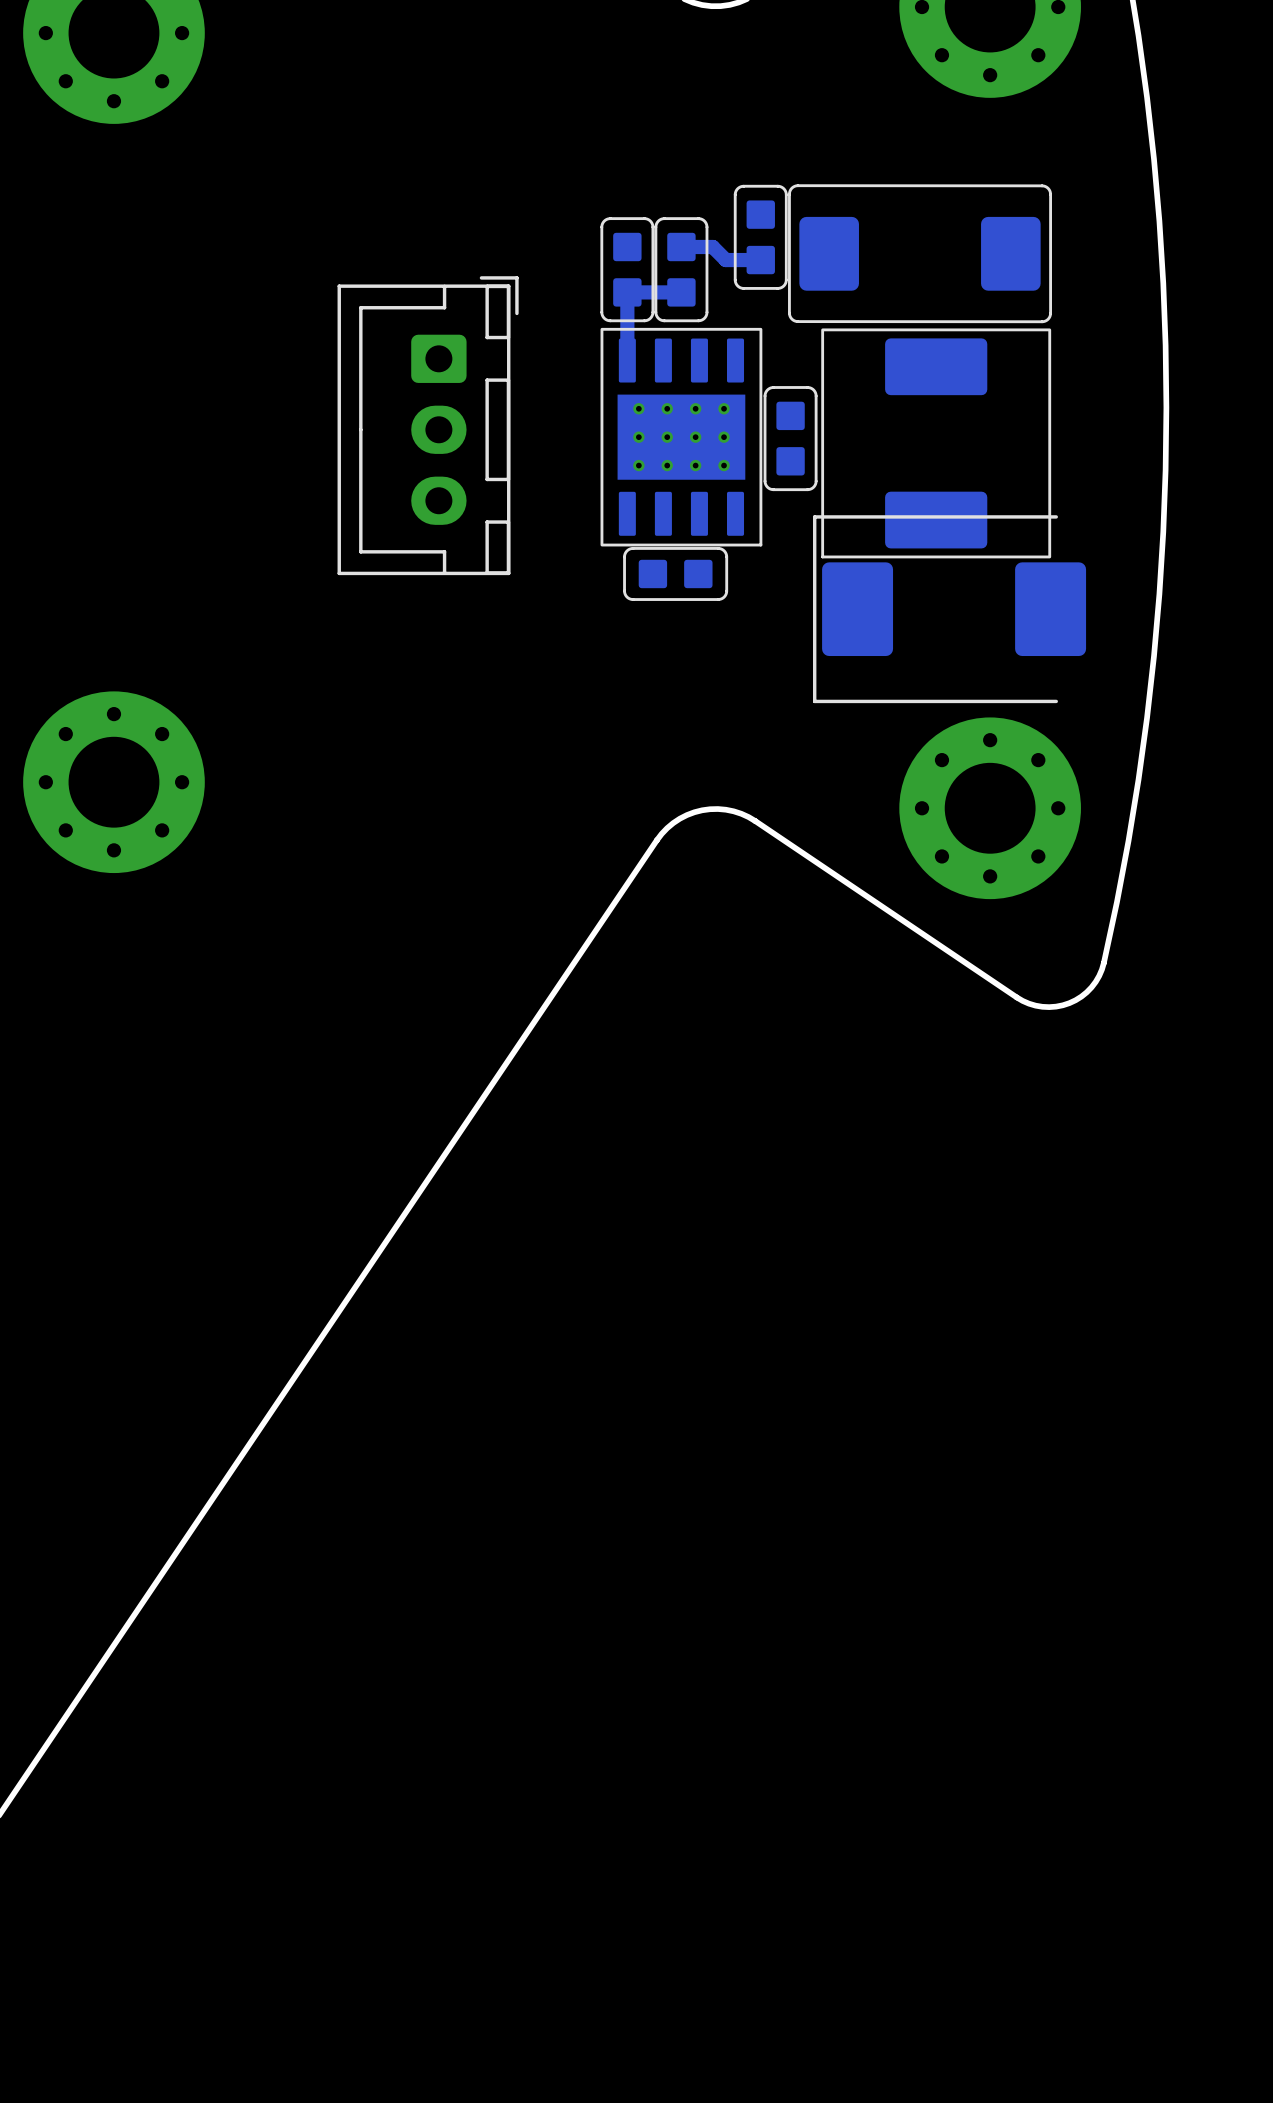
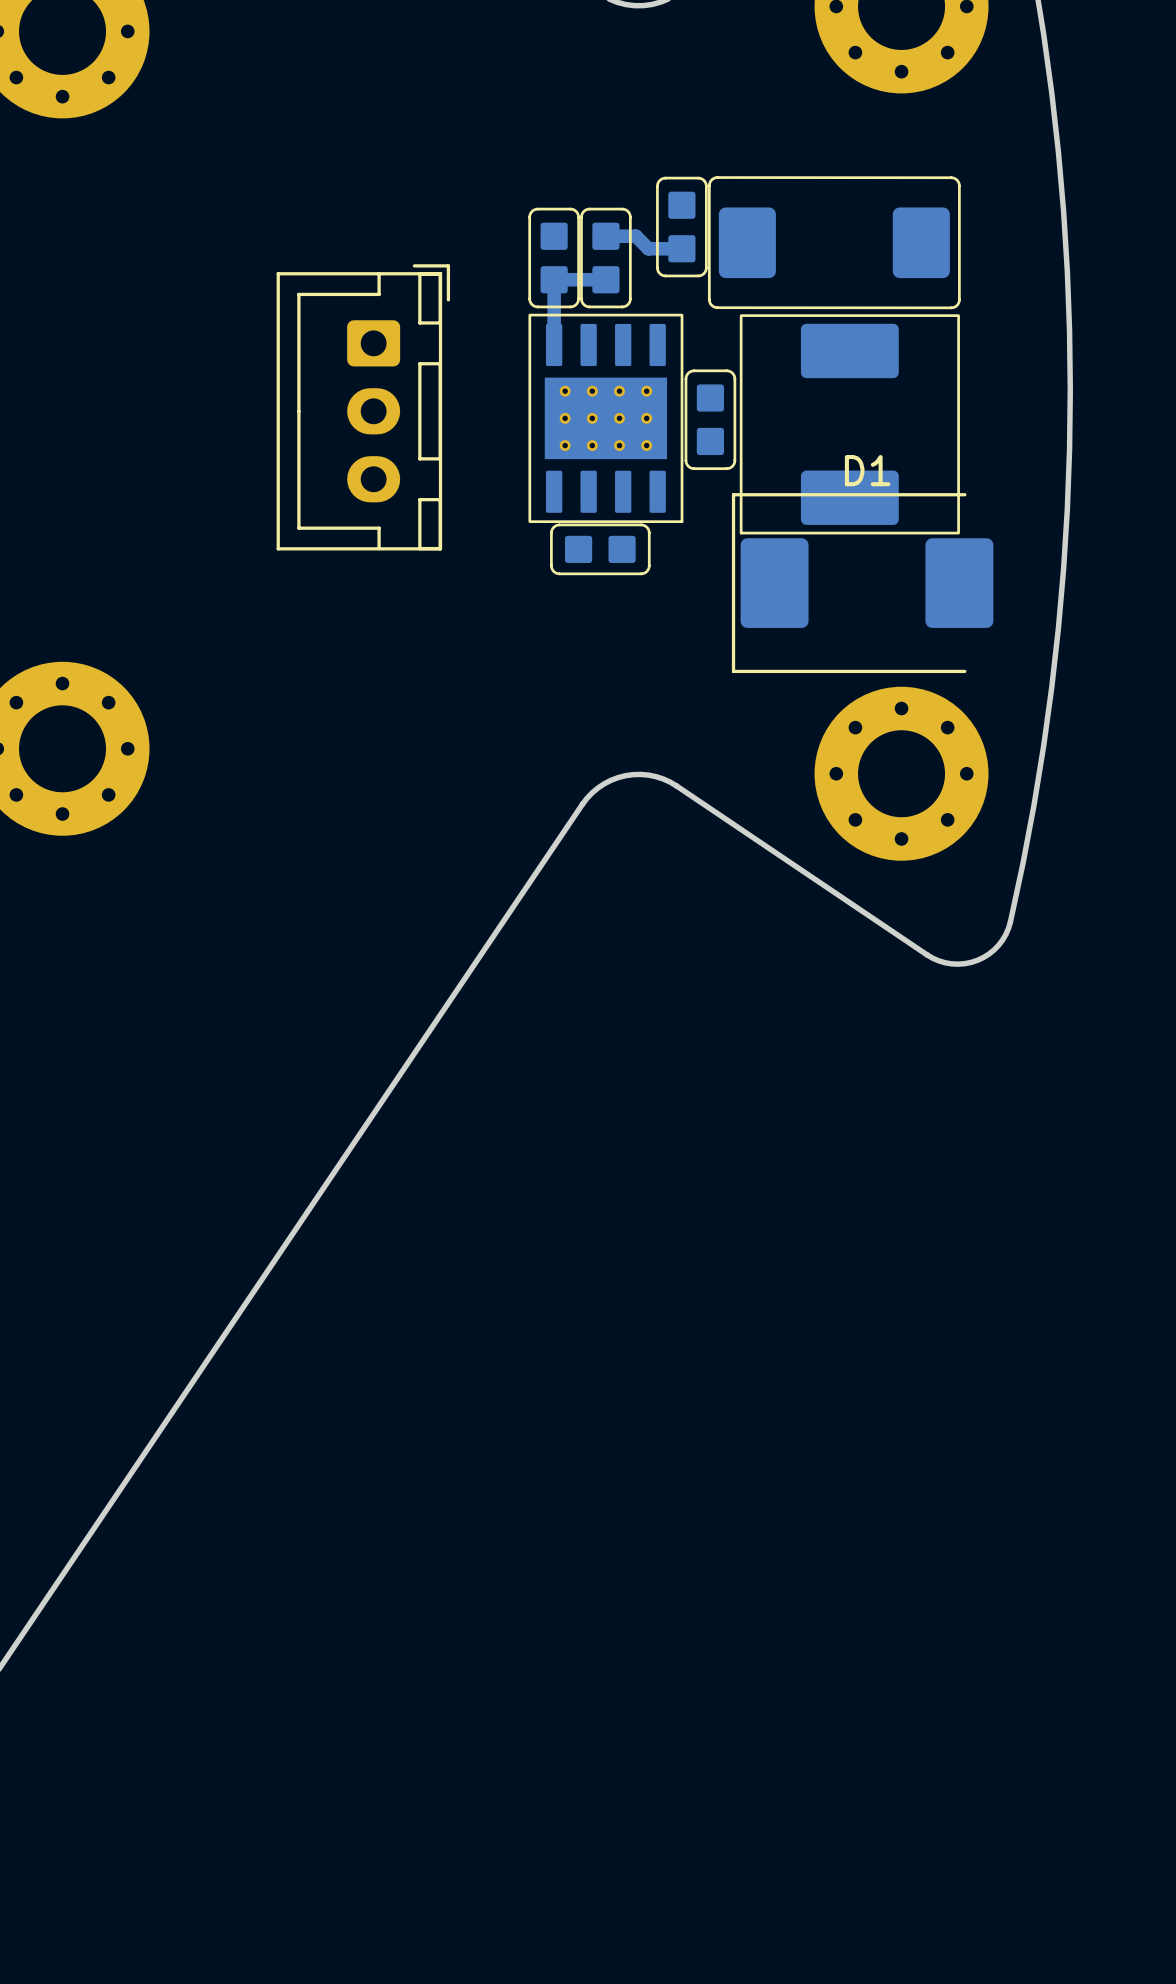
D1 name: none -> D1 (867, 470)

